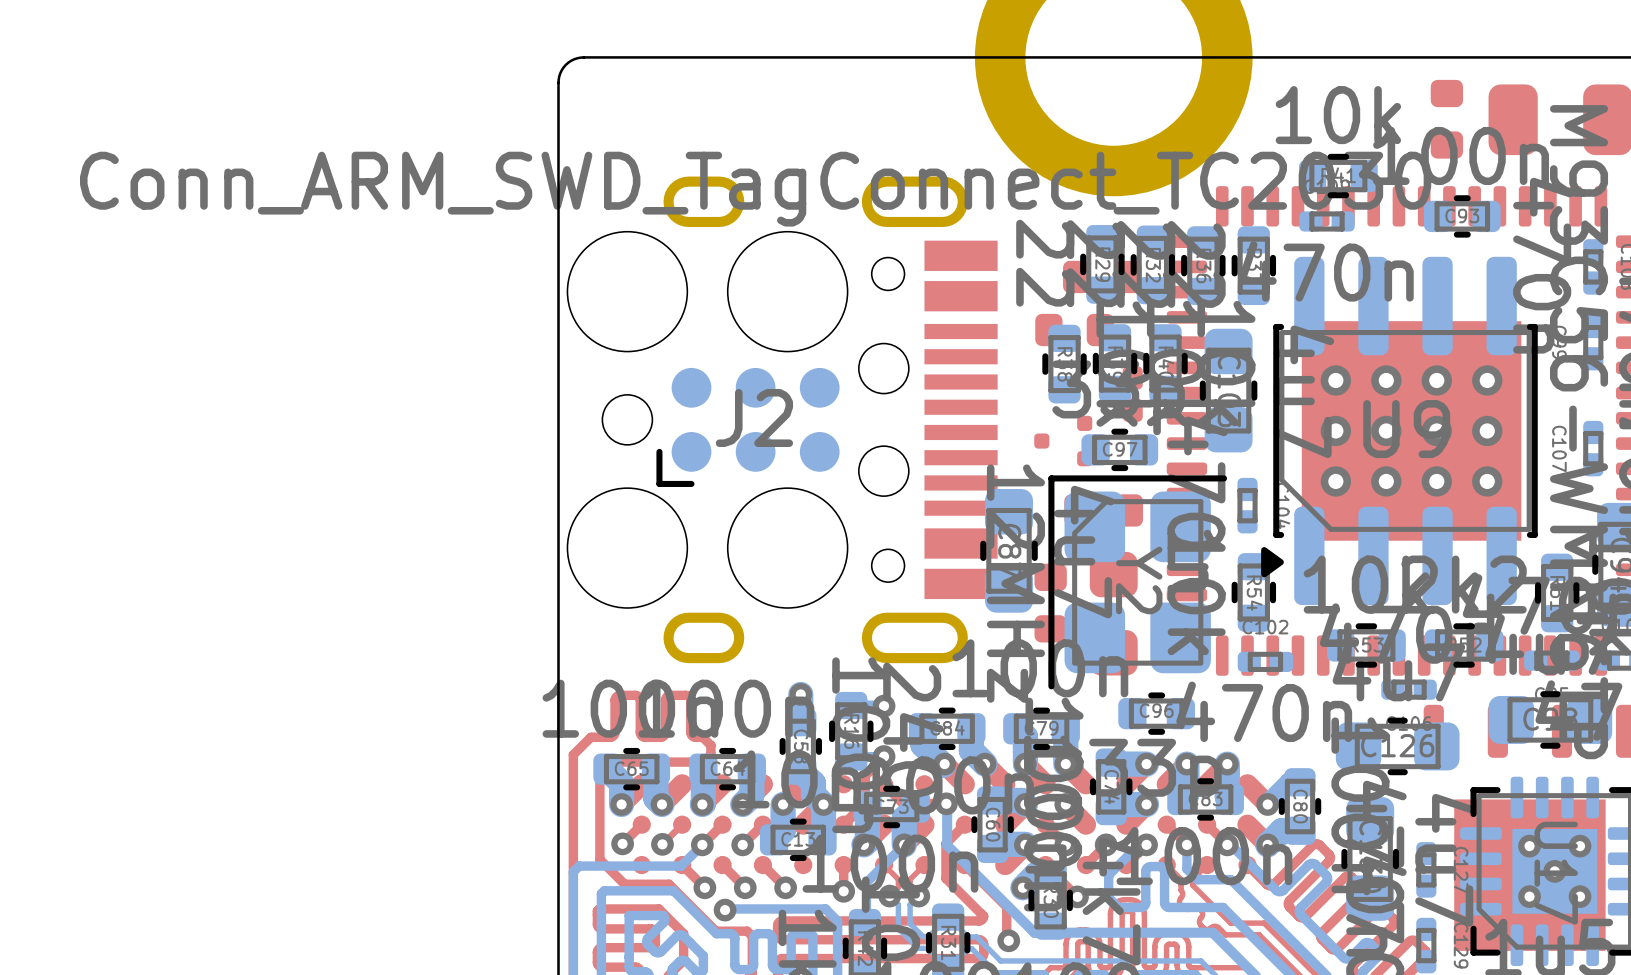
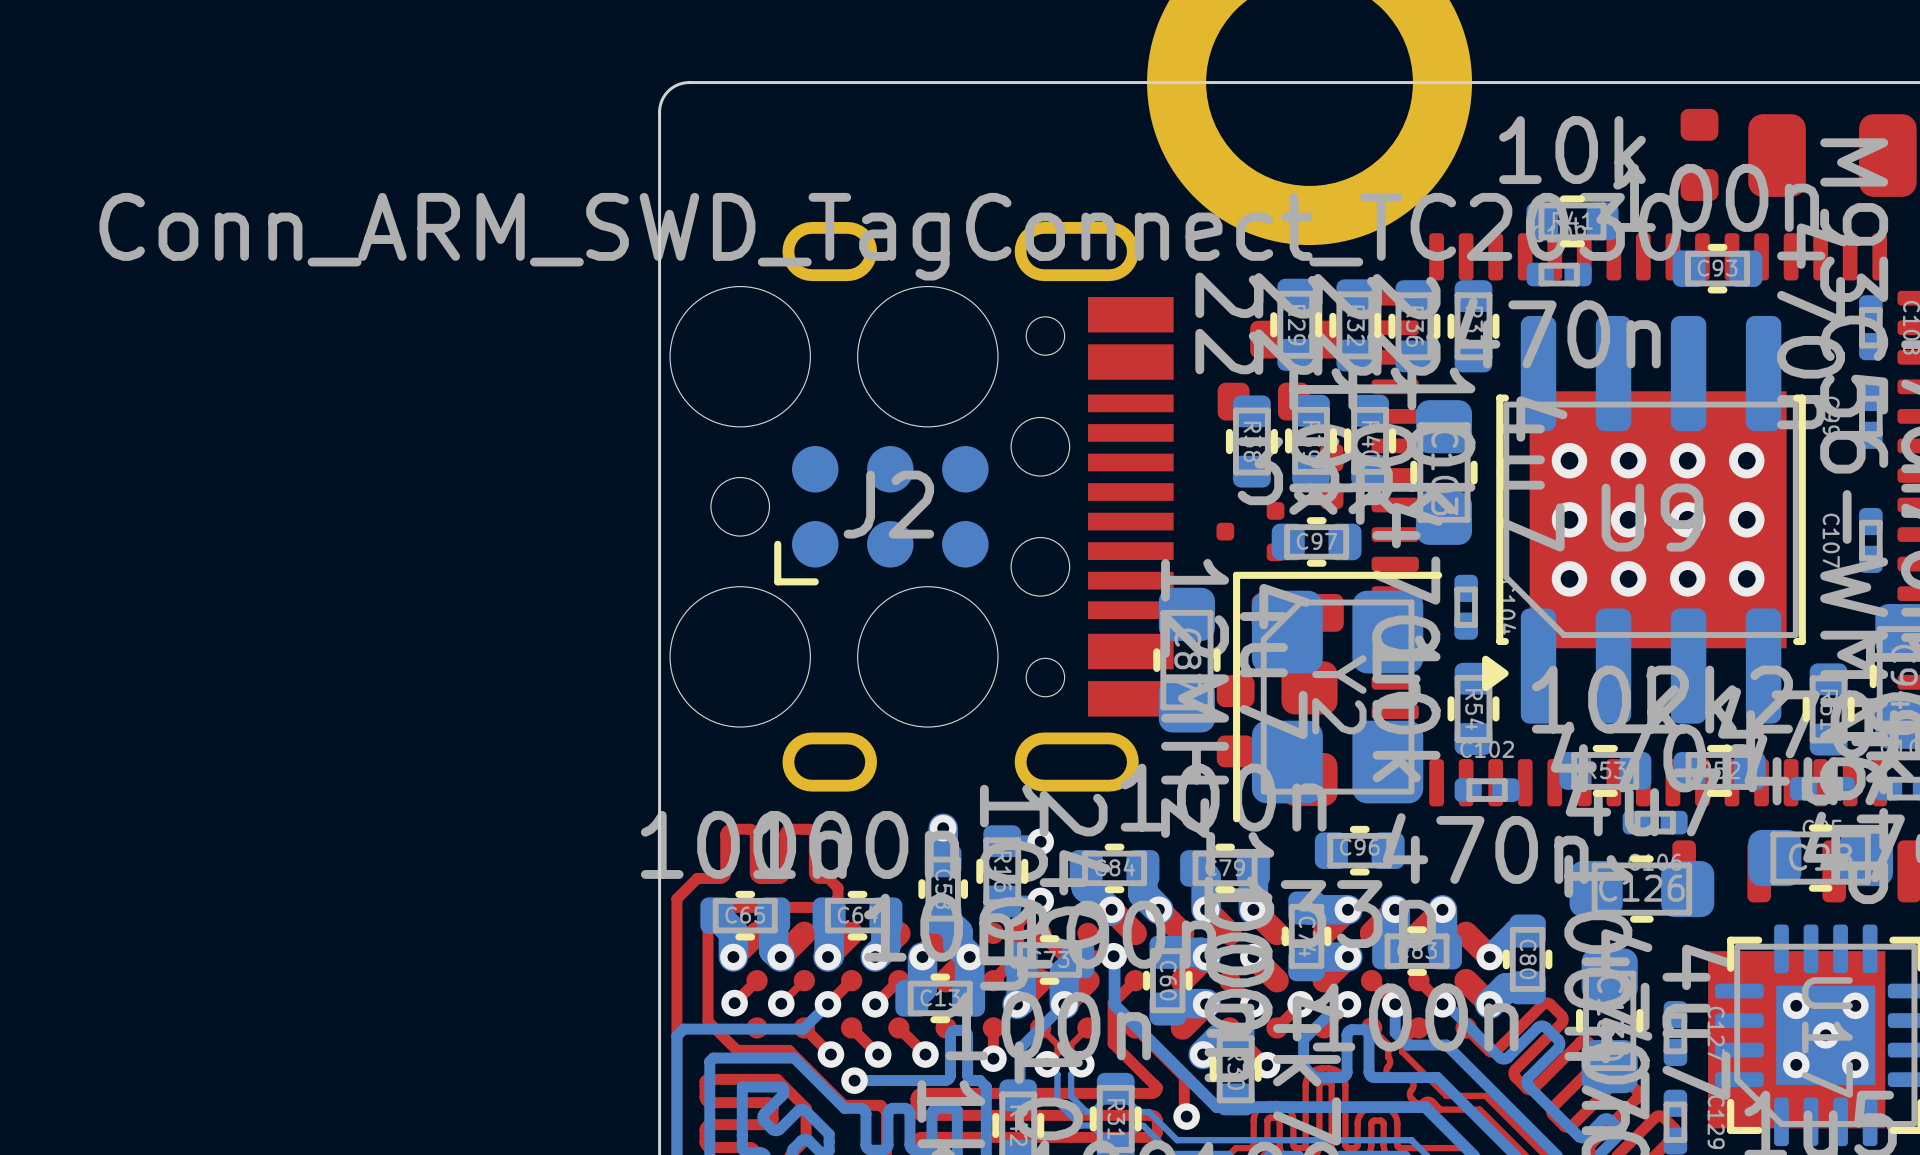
bottom track: (725, 909) (825, 908) (837, 921) -> (854, 1080) (947, 1079) (950, 1075) (950, 1033) (954, 1030) (962, 1030) (967, 1035) (967, 1076) (971, 1080) (979, 1080) (986, 1087) (986, 1093)

